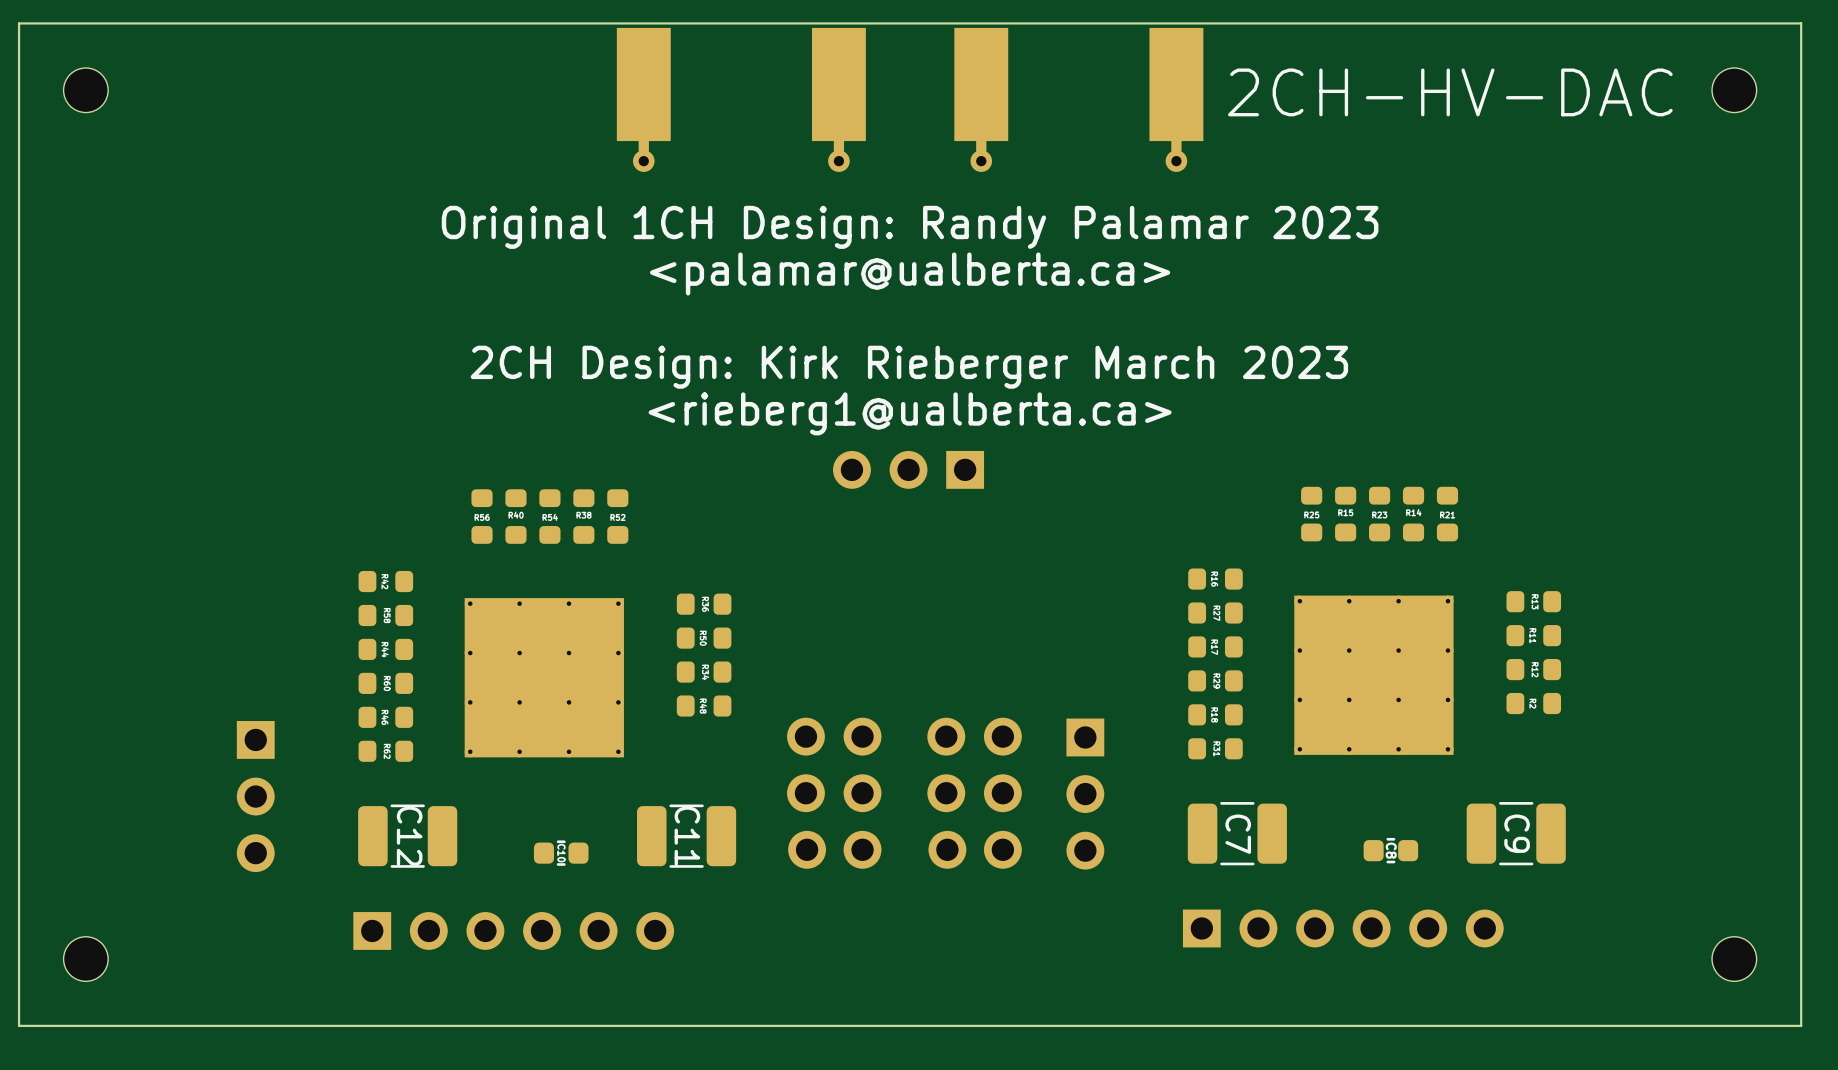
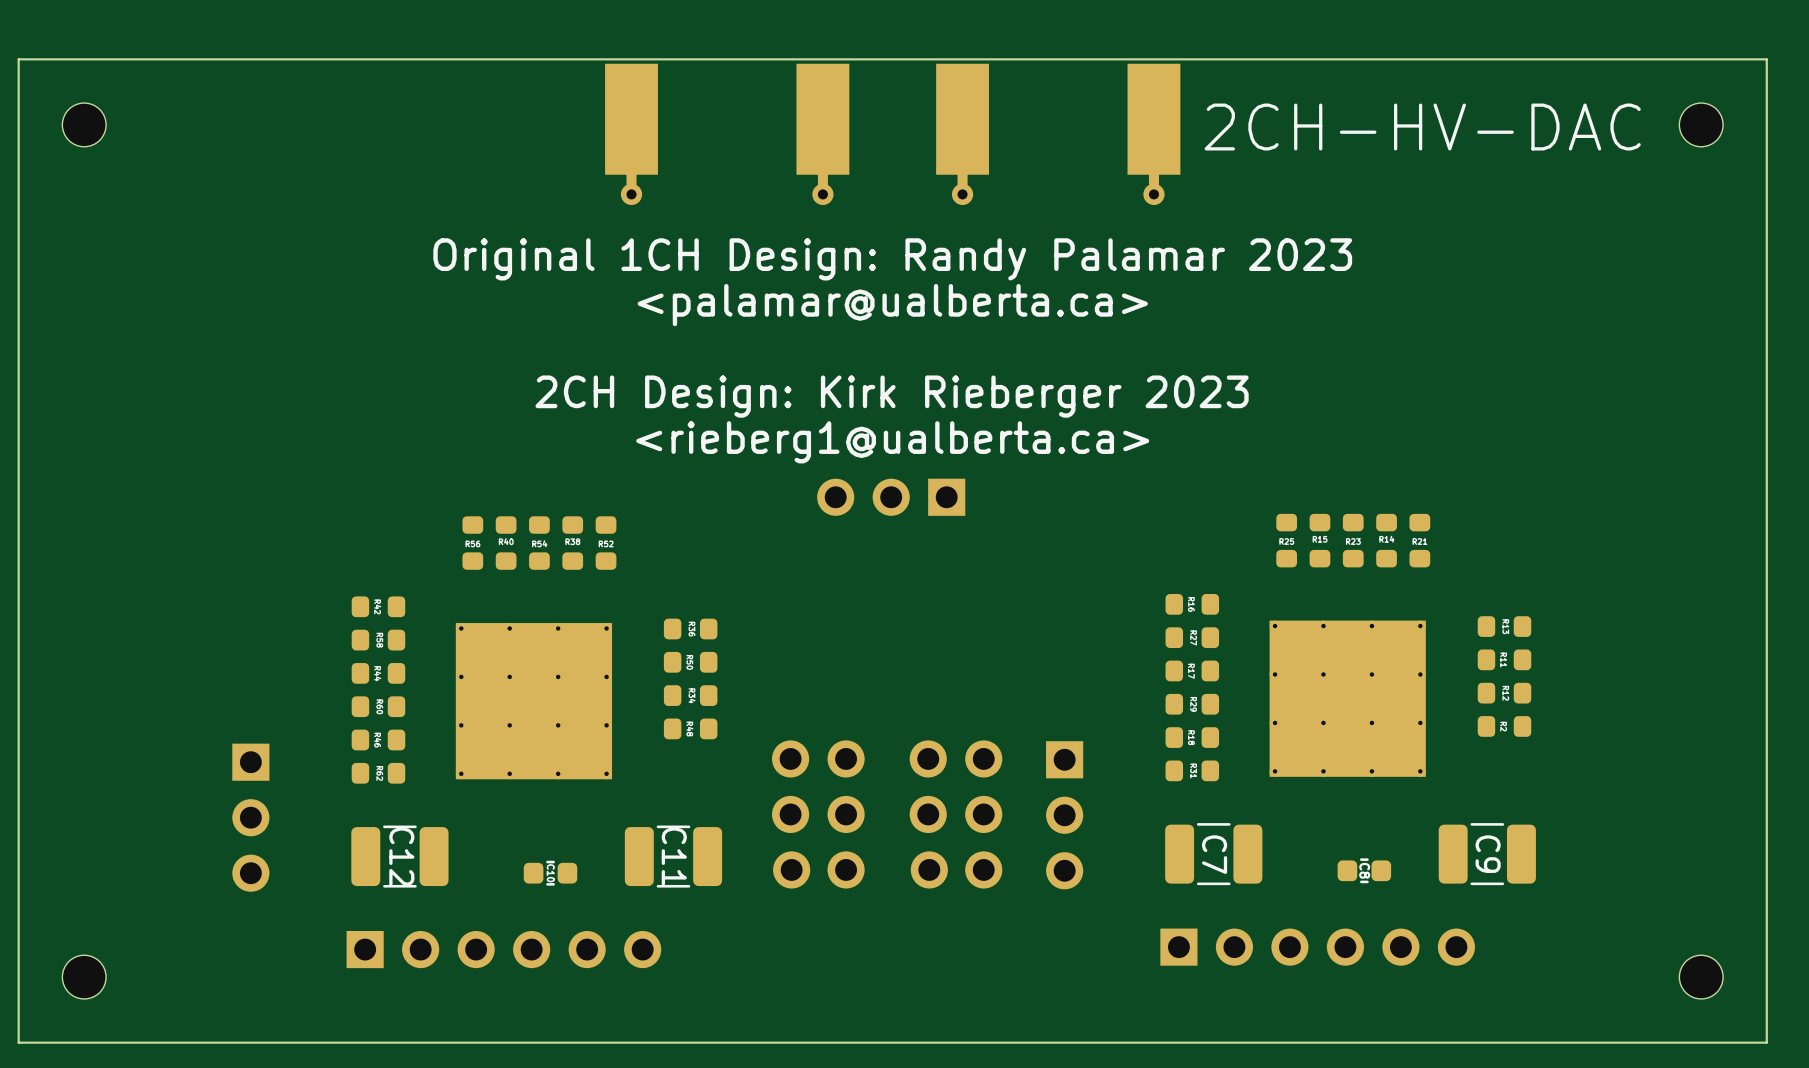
text: 2CH Design: Kirk Rieberger March 2023 (909, 367) -> 2CH Design: Kirk Rieberger 2023 (892, 396)

